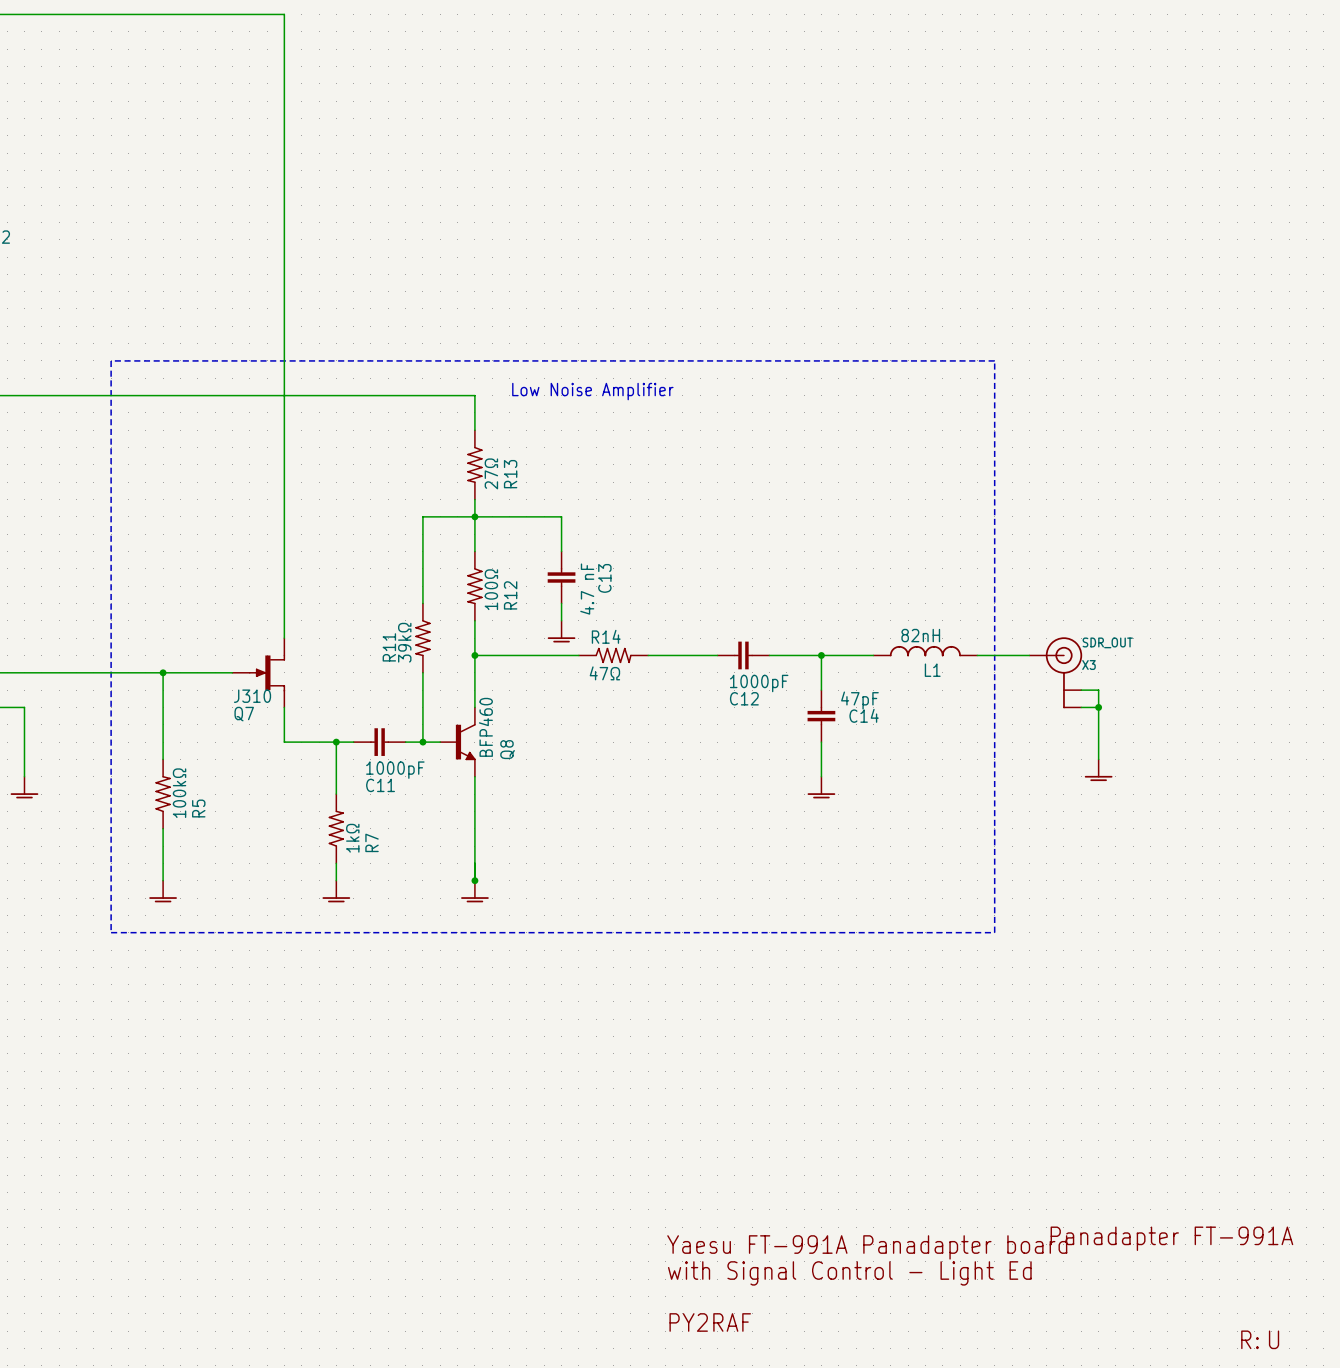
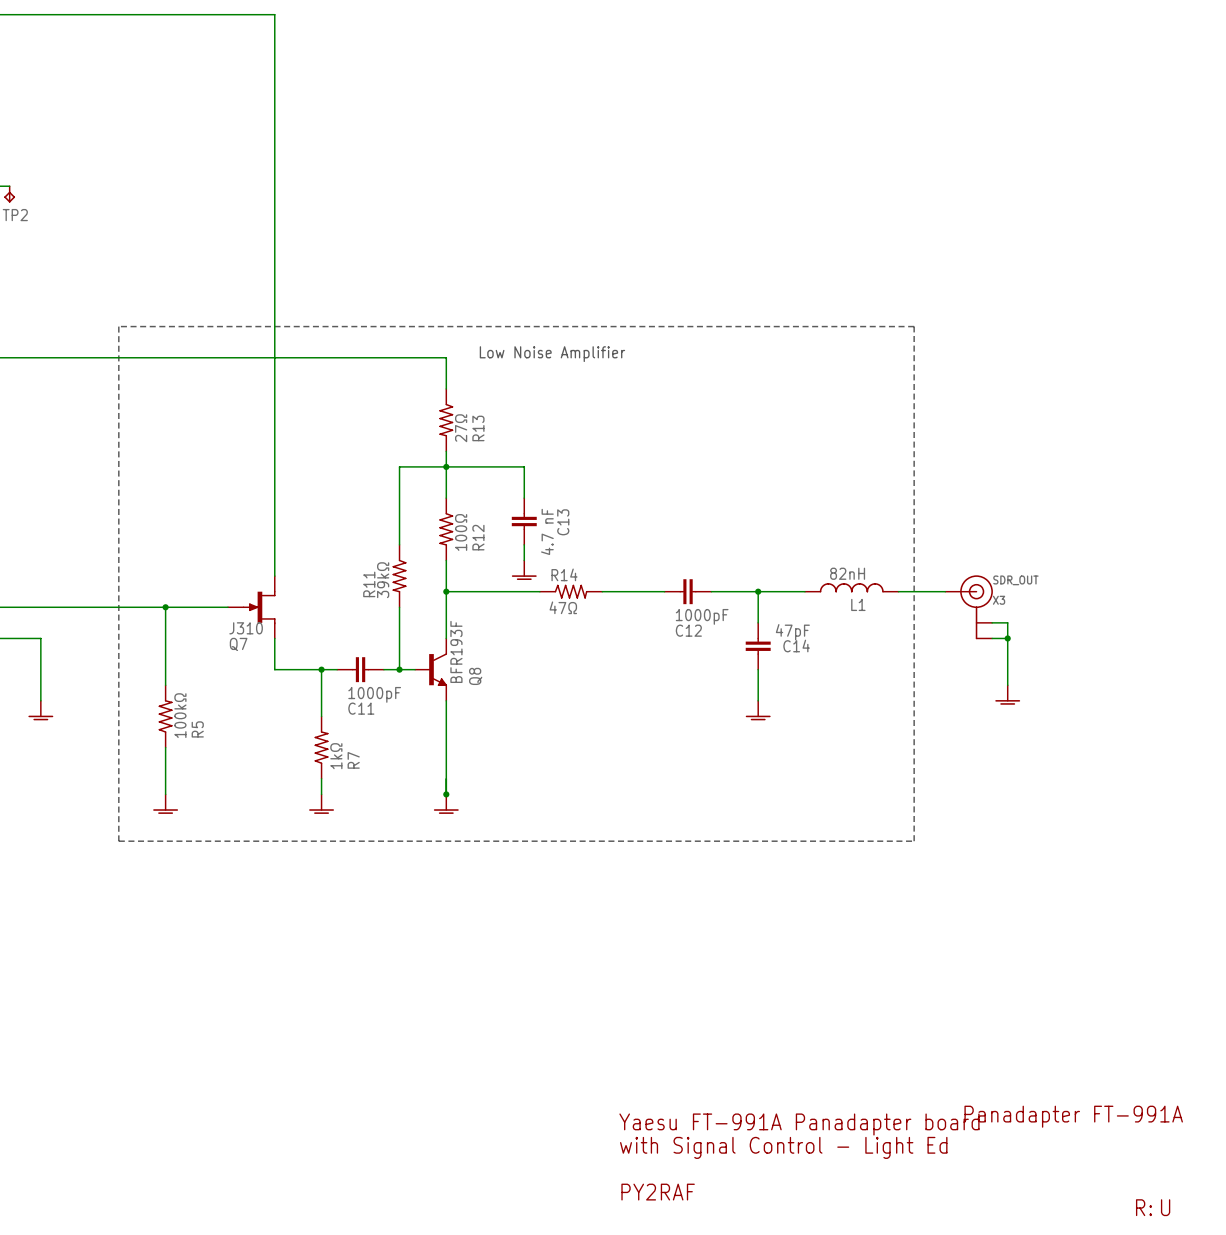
Q8 value: BFP460 (485, 727) -> BFR193F (456, 651)

